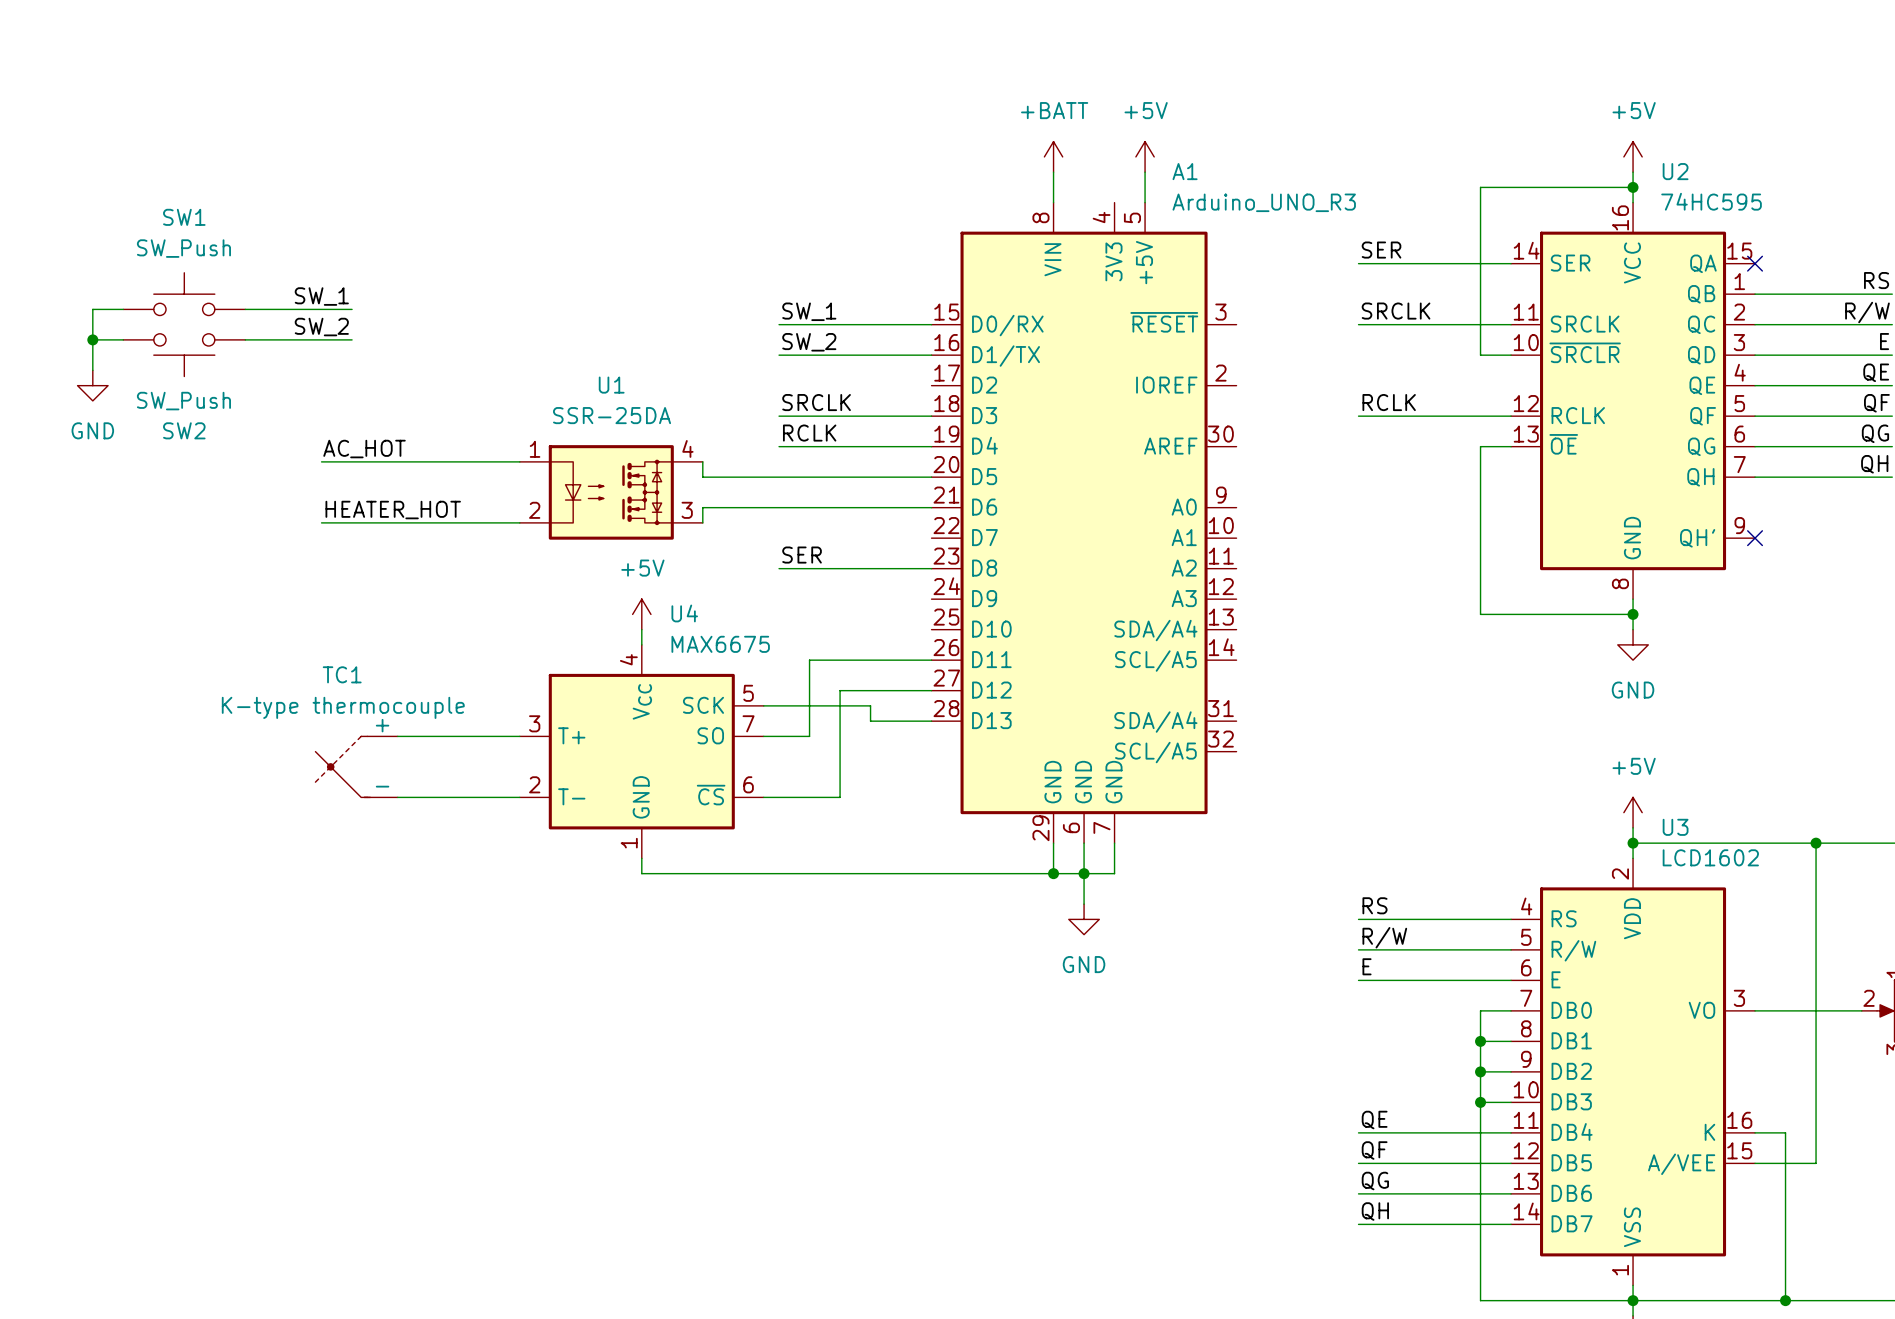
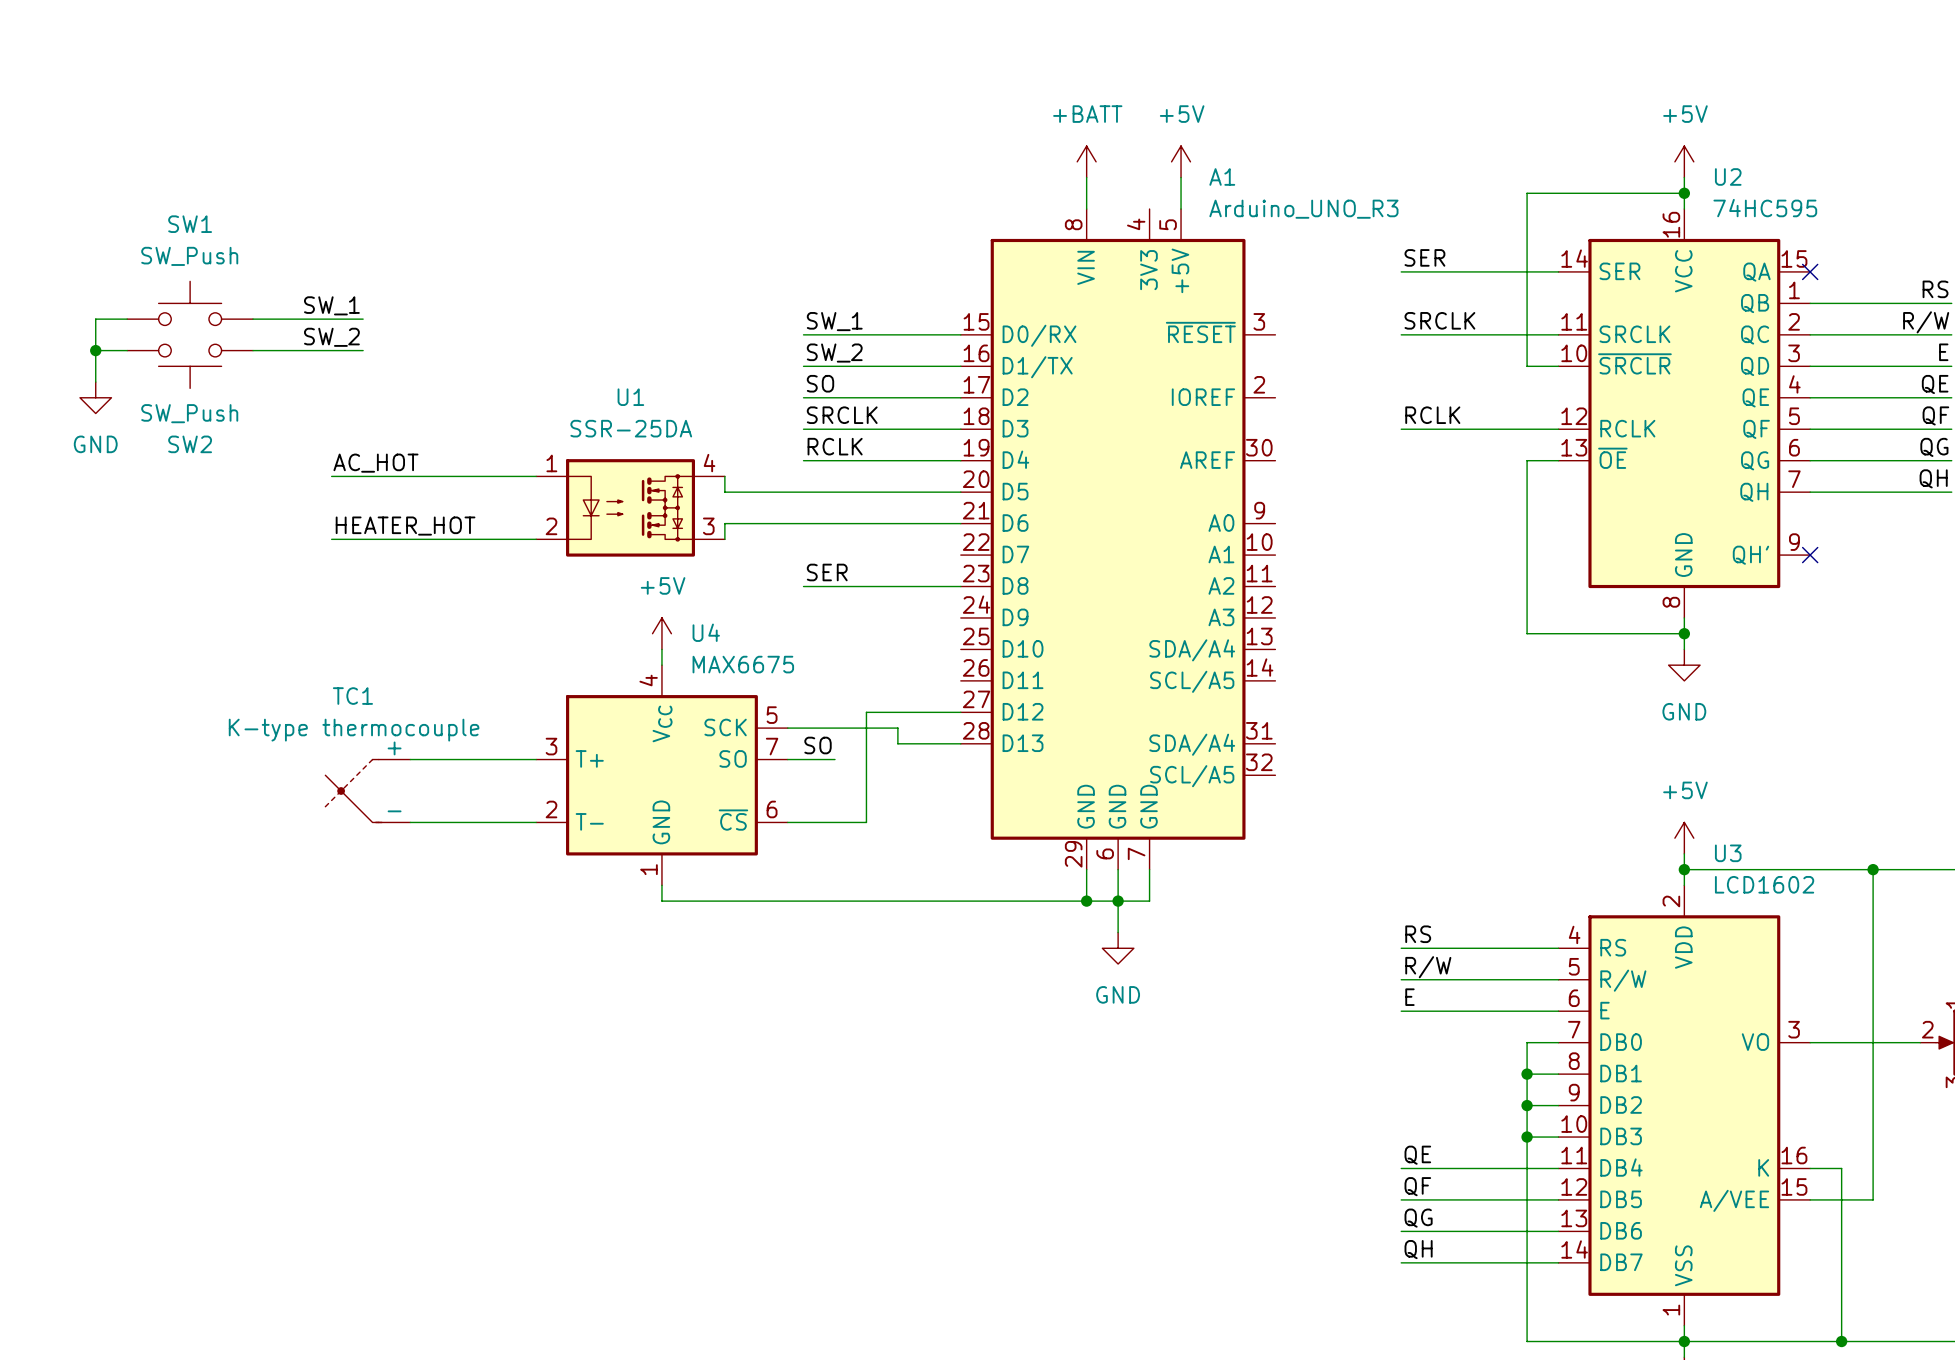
label: none -> SO (820, 383)
wire: none -> (803, 397) (960, 397)
wire: (931, 660) (809, 660) (809, 736) -> none
label: none -> SO (818, 745)

